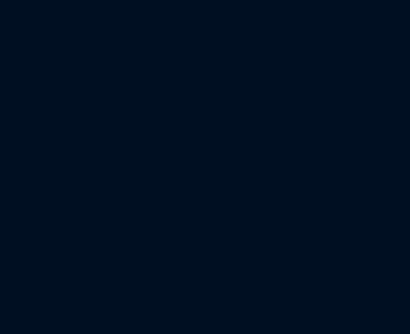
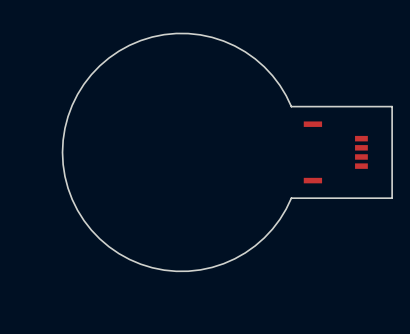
board edge: none -> (392, 106) (392, 198) (291, 198) (279, 219) (255, 245) (234, 258) (212, 267) (188, 271) (164, 270) (140, 264) (118, 253) (99, 238) (84, 220) (72, 199) (64, 176) (63, 140) (68, 116) (77, 94) (91, 74) (109, 58) (129, 45) (152, 37) (176, 33) (200, 34) (234, 45) (255, 58) (272, 75) (291, 106) (392, 106)
part: none -> (335, 152)

